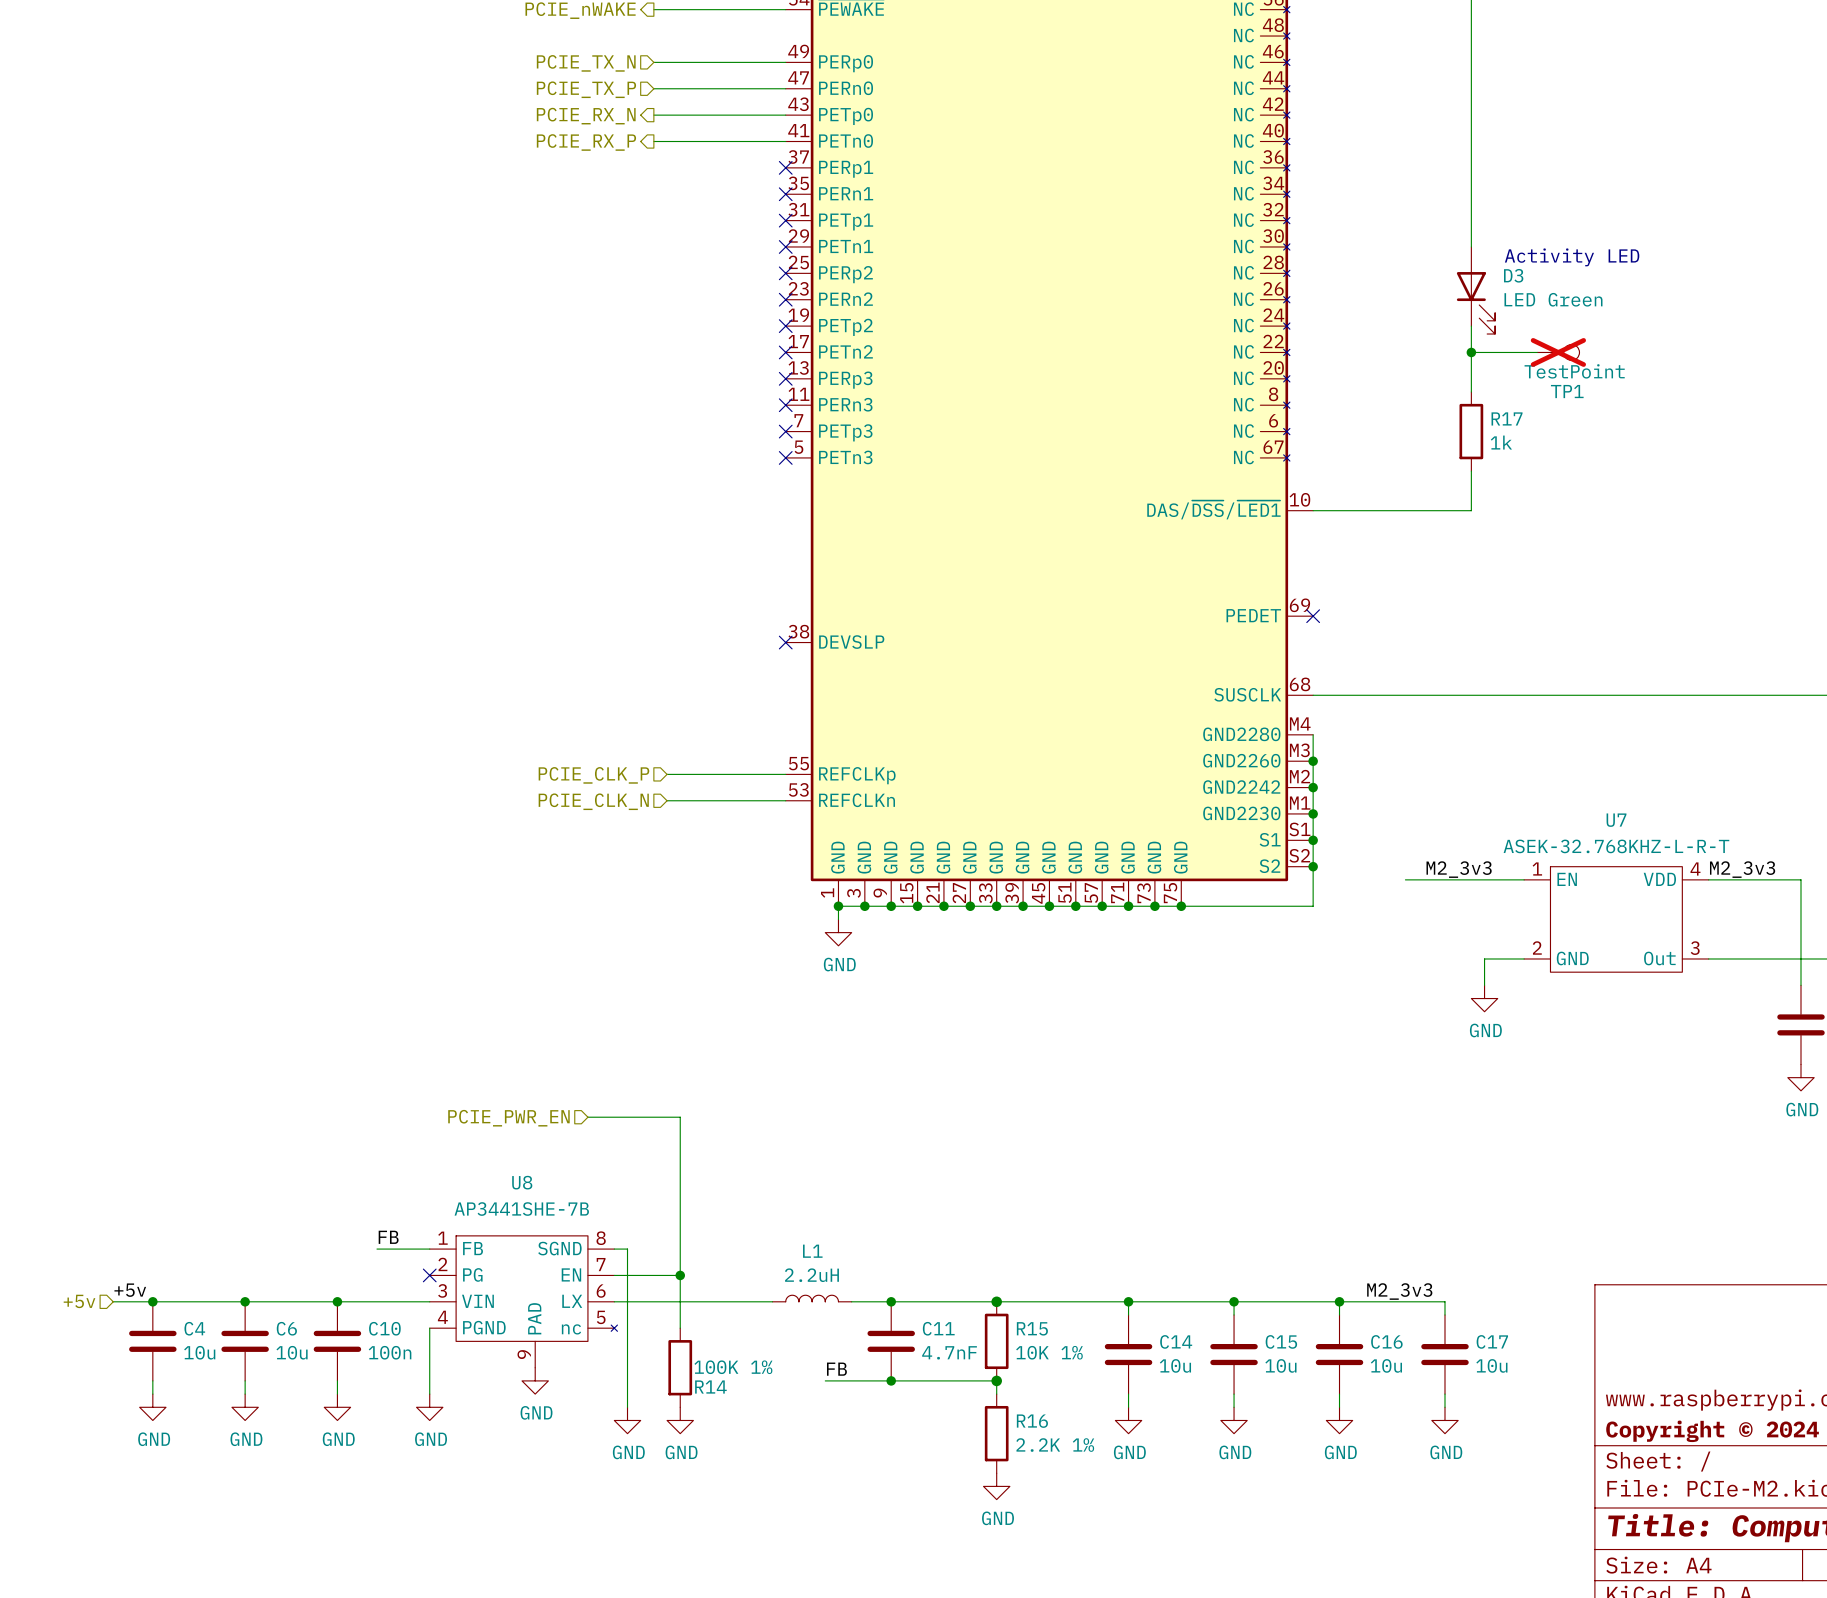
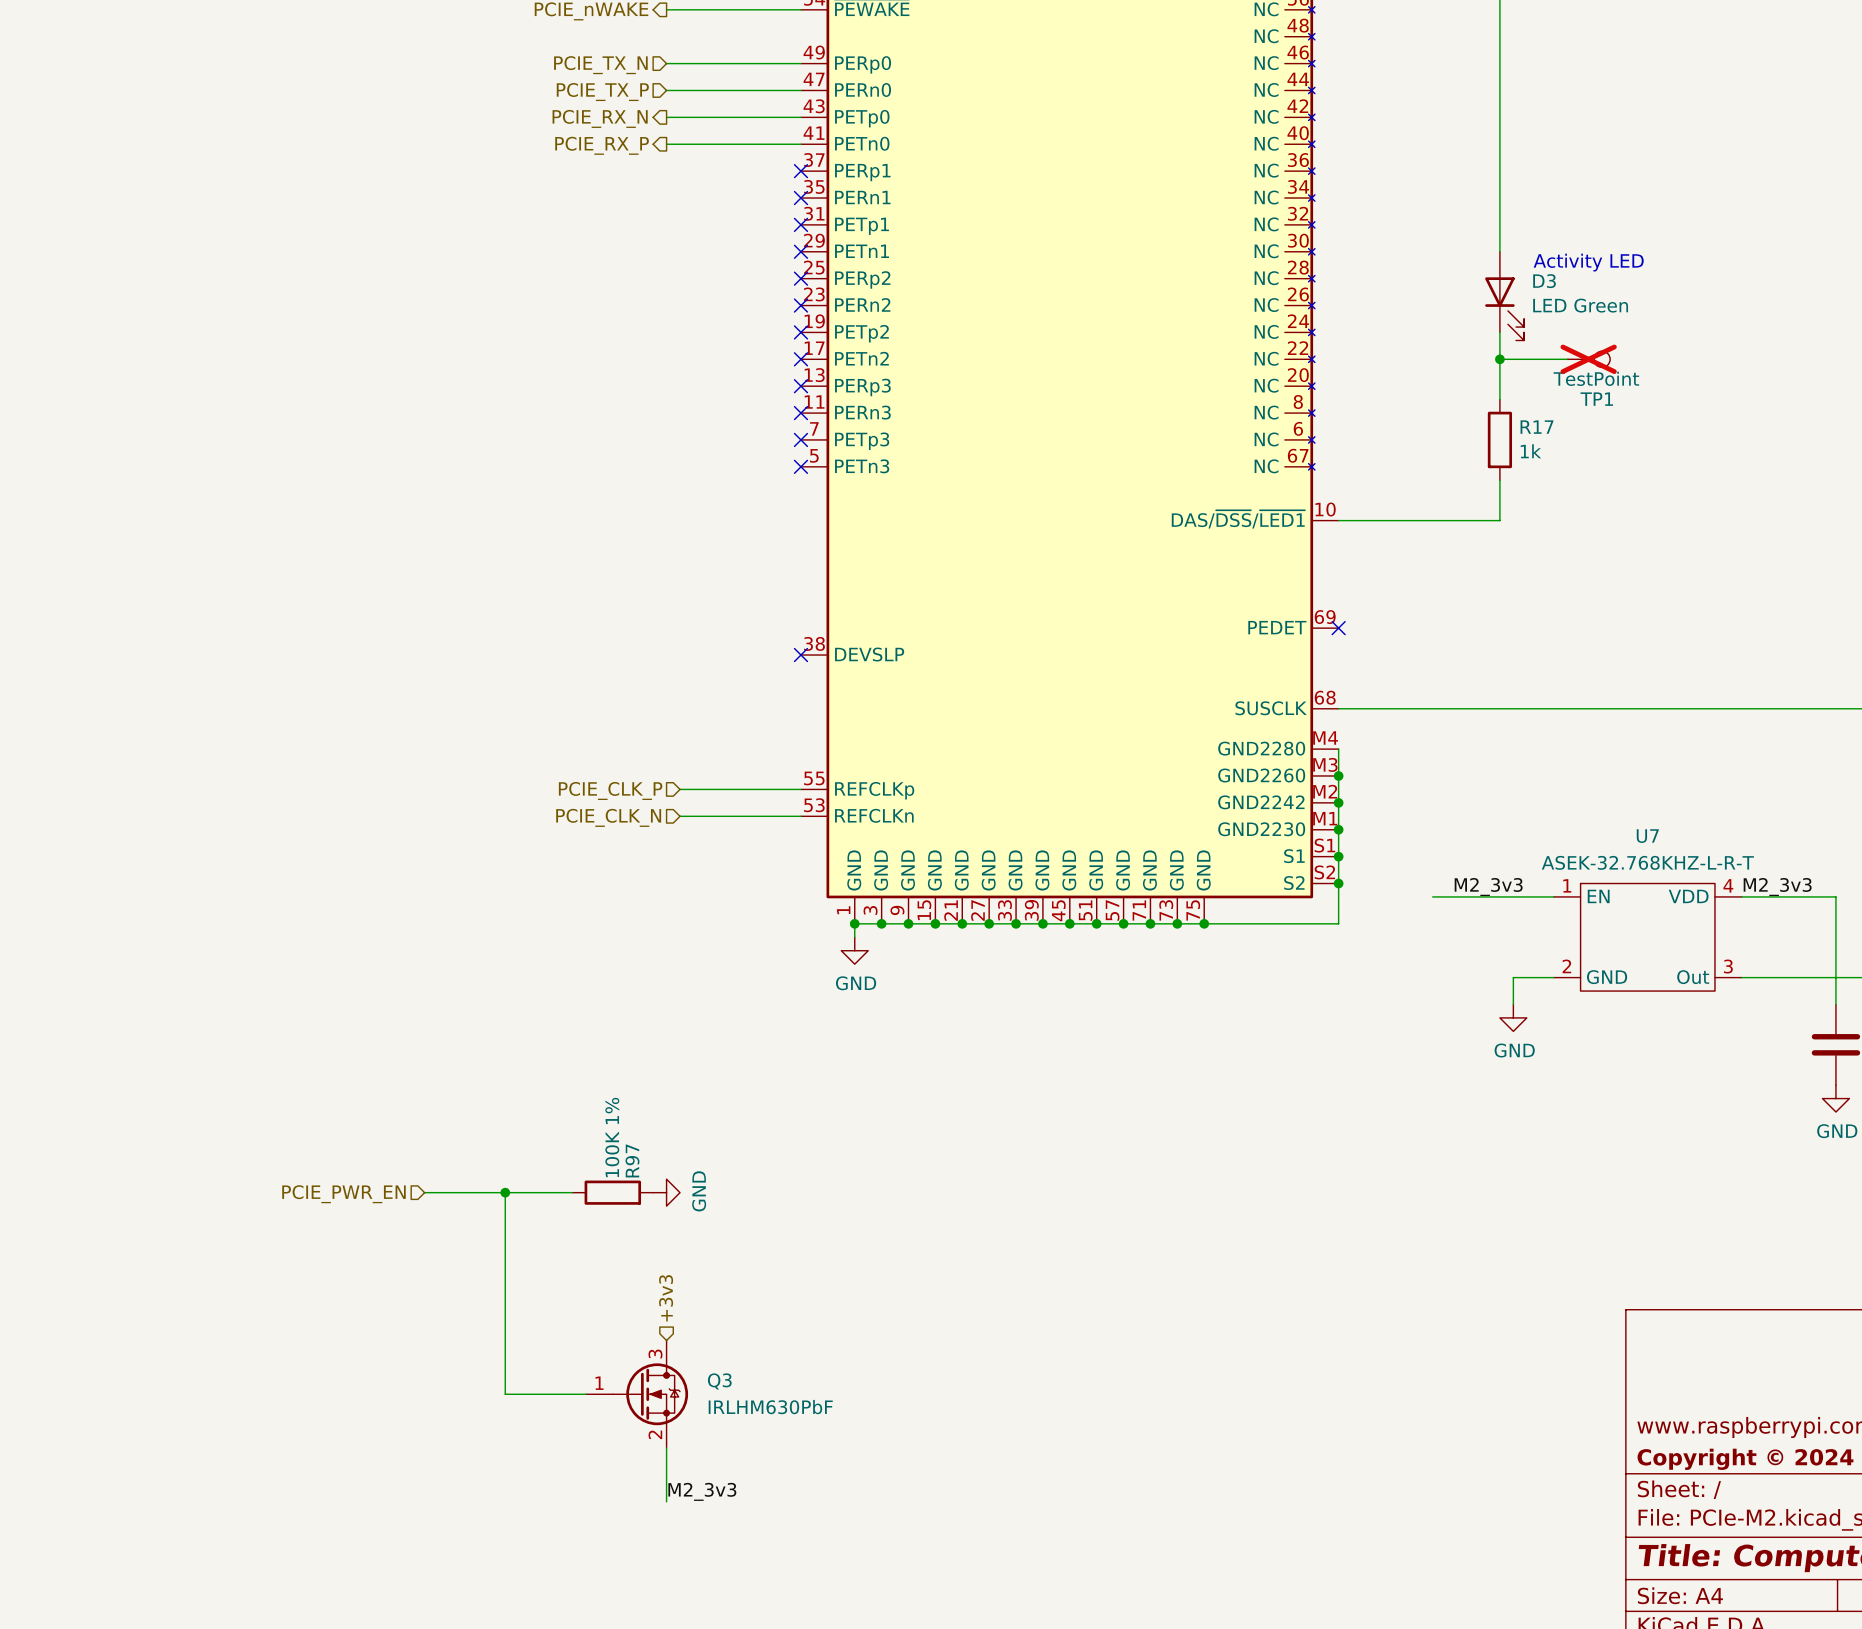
wire: (587, 1117) (680, 1117) (680, 1328) -> none
hierarchical label position: PCIE_PWR_EN (508, 1118) -> PCIE_PWR_EN (344, 1194)
wire: none -> (424, 1192) (572, 1192)
wire: none -> (505, 1192) (505, 1394) (585, 1394)
junction: none -> (505, 1192)
R97: none -> 100K 1% (612, 1192)
power symbol: none -> GND (666, 1192)
label: FB (388, 1237) -> none
wire: (376, 1249) (429, 1249) -> none
wire: (614, 1249) (627, 1249) (627, 1407) -> none
no-connect mark: (429, 1275) -> none
wire: (614, 1275) (680, 1275) -> none
hierarchical label: none -> +3v3 (666, 1298)
junction: (680, 1275) -> none
label: +5v (130, 1290) -> none
label: M2_3v3 (1399, 1291) -> none
L1: 2.2uH (812, 1298) -> none
hierarchical label: +5v (79, 1301) -> none
wire: (113, 1301) (429, 1301) -> none
junction: (152, 1301) -> none
junction: (245, 1301) -> none
junction: (337, 1301) -> none
U8: AP3441SHE-7B (523, 1301) -> none
wire: (614, 1301) (772, 1301) -> none
wire: (851, 1301) (1444, 1301) (1444, 1314) -> none
junction: (891, 1301) -> none
junction: (996, 1301) -> none
wire: (1128, 1301) (1128, 1314) -> none
junction: (1128, 1301) -> none
wire: (1234, 1301) (1234, 1314) -> none
junction: (1234, 1301) -> none
wire: (1339, 1301) (1339, 1314) -> none
junction: (1339, 1301) -> none
wire: (429, 1328) (429, 1394) -> none
C4: 10u (152, 1341) -> none
C6: 10u (245, 1341) -> none
C10: 100n (337, 1341) -> none
C11: 4.7nF (891, 1341) -> none
R15: 10K 1% (996, 1341) -> none
C14: 10u (1128, 1354) -> none
C15: 10u (1234, 1354) -> none
C16: 10u (1339, 1354) -> none
C17: 10u (1444, 1354) -> none
Q3: none -> IRLHM630PbF (637, 1394)
R14: 100K 1% (680, 1367) -> none
label: FB (836, 1369) -> none
wire: (152, 1380) (152, 1394) -> none
wire: (245, 1380) (245, 1394) -> none
wire: (337, 1380) (337, 1394) -> none
power symbol: GND (535, 1380) -> none
wire: (825, 1380) (996, 1380) (996, 1394) -> none
junction: (891, 1380) -> none
junction: (996, 1380) -> none
wire: (1128, 1394) (1128, 1407) -> none
wire: (1234, 1394) (1234, 1407) -> none
wire: (1339, 1394) (1339, 1407) -> none
wire: (1444, 1394) (1444, 1407) -> none
power symbol: GND (152, 1407) -> none
power symbol: GND (245, 1407) -> none
power symbol: GND (337, 1407) -> none
power symbol: GND (429, 1407) -> none
power symbol: GND (627, 1420) -> none
wire: none -> (666, 1448) (666, 1501)
power symbol: GND (680, 1420) -> none
power symbol: GND (1128, 1420) -> none
power symbol: GND (1234, 1420) -> none
power symbol: GND (1339, 1420) -> none
power symbol: GND (1444, 1420) -> none
R16: 2.2K 1% (996, 1433) -> none
label: none -> M2_3v3 (702, 1491)
power symbol: GND (996, 1486) -> none

